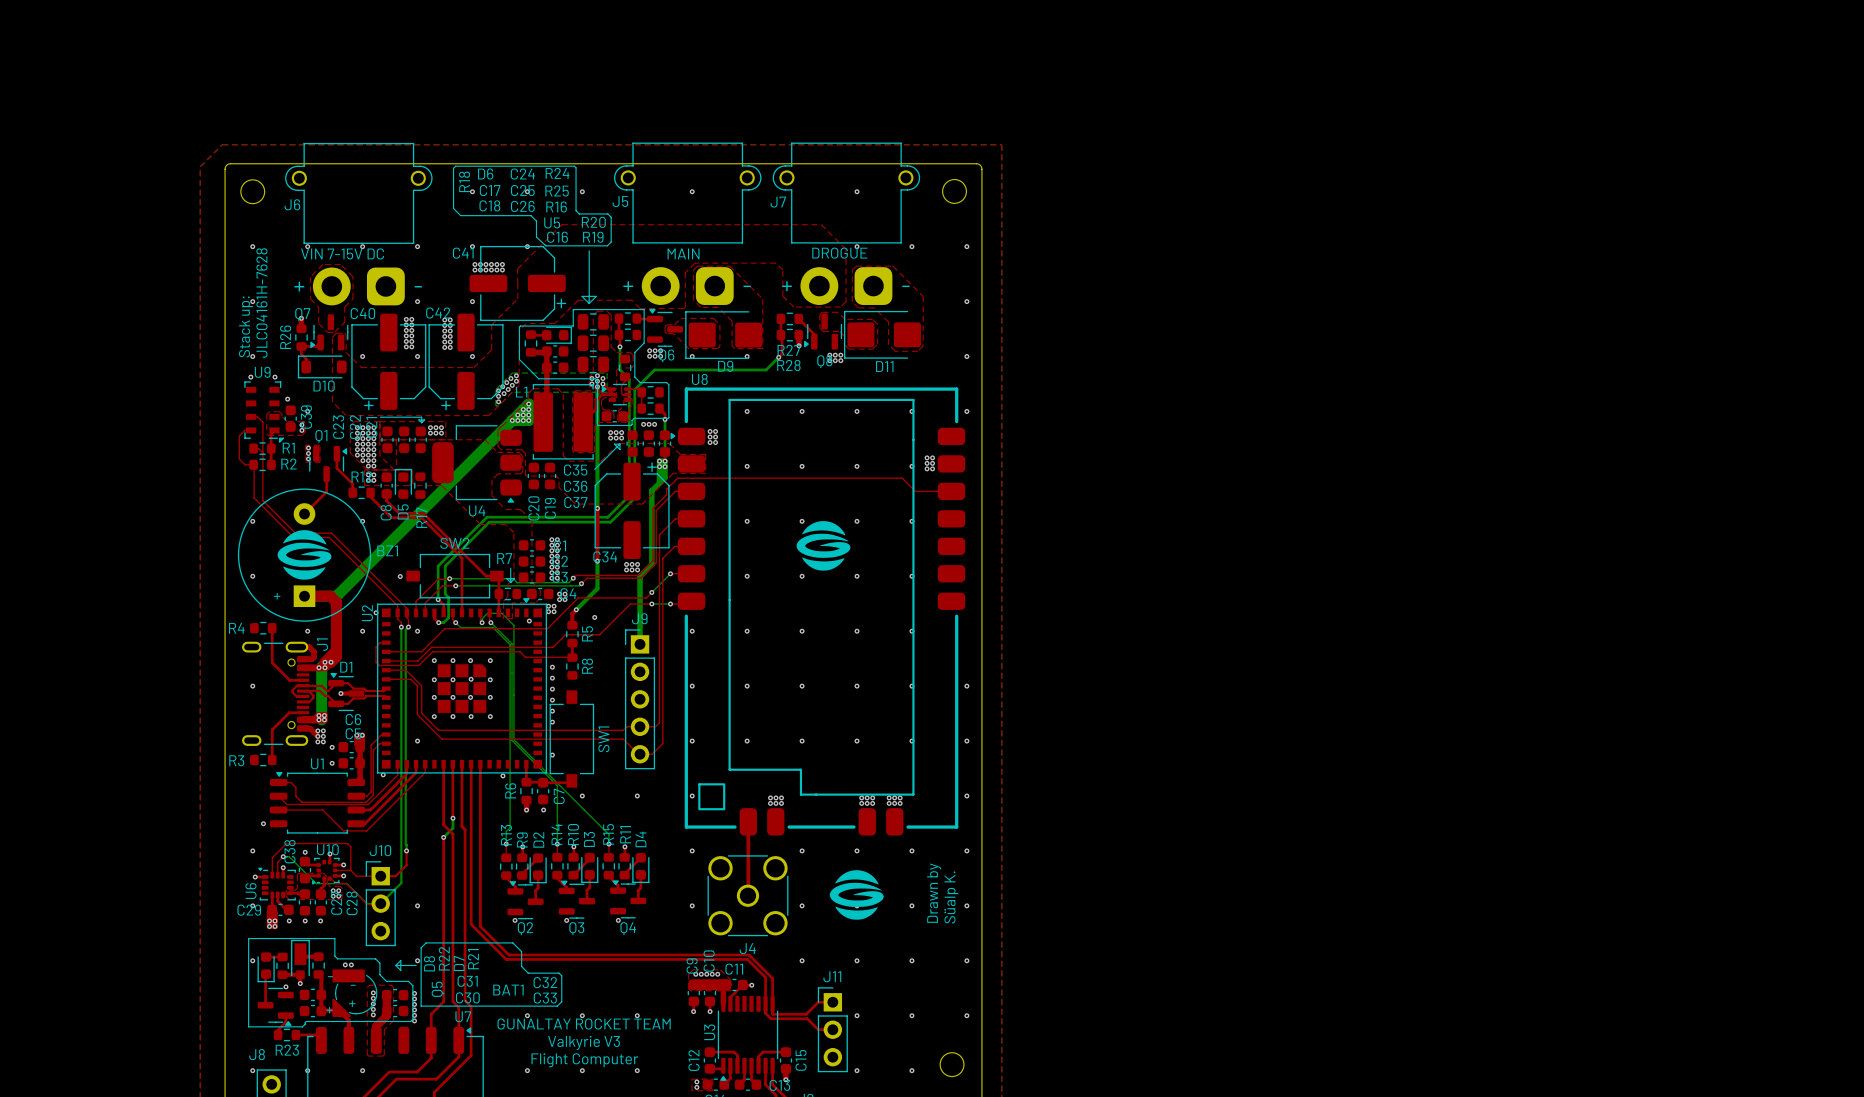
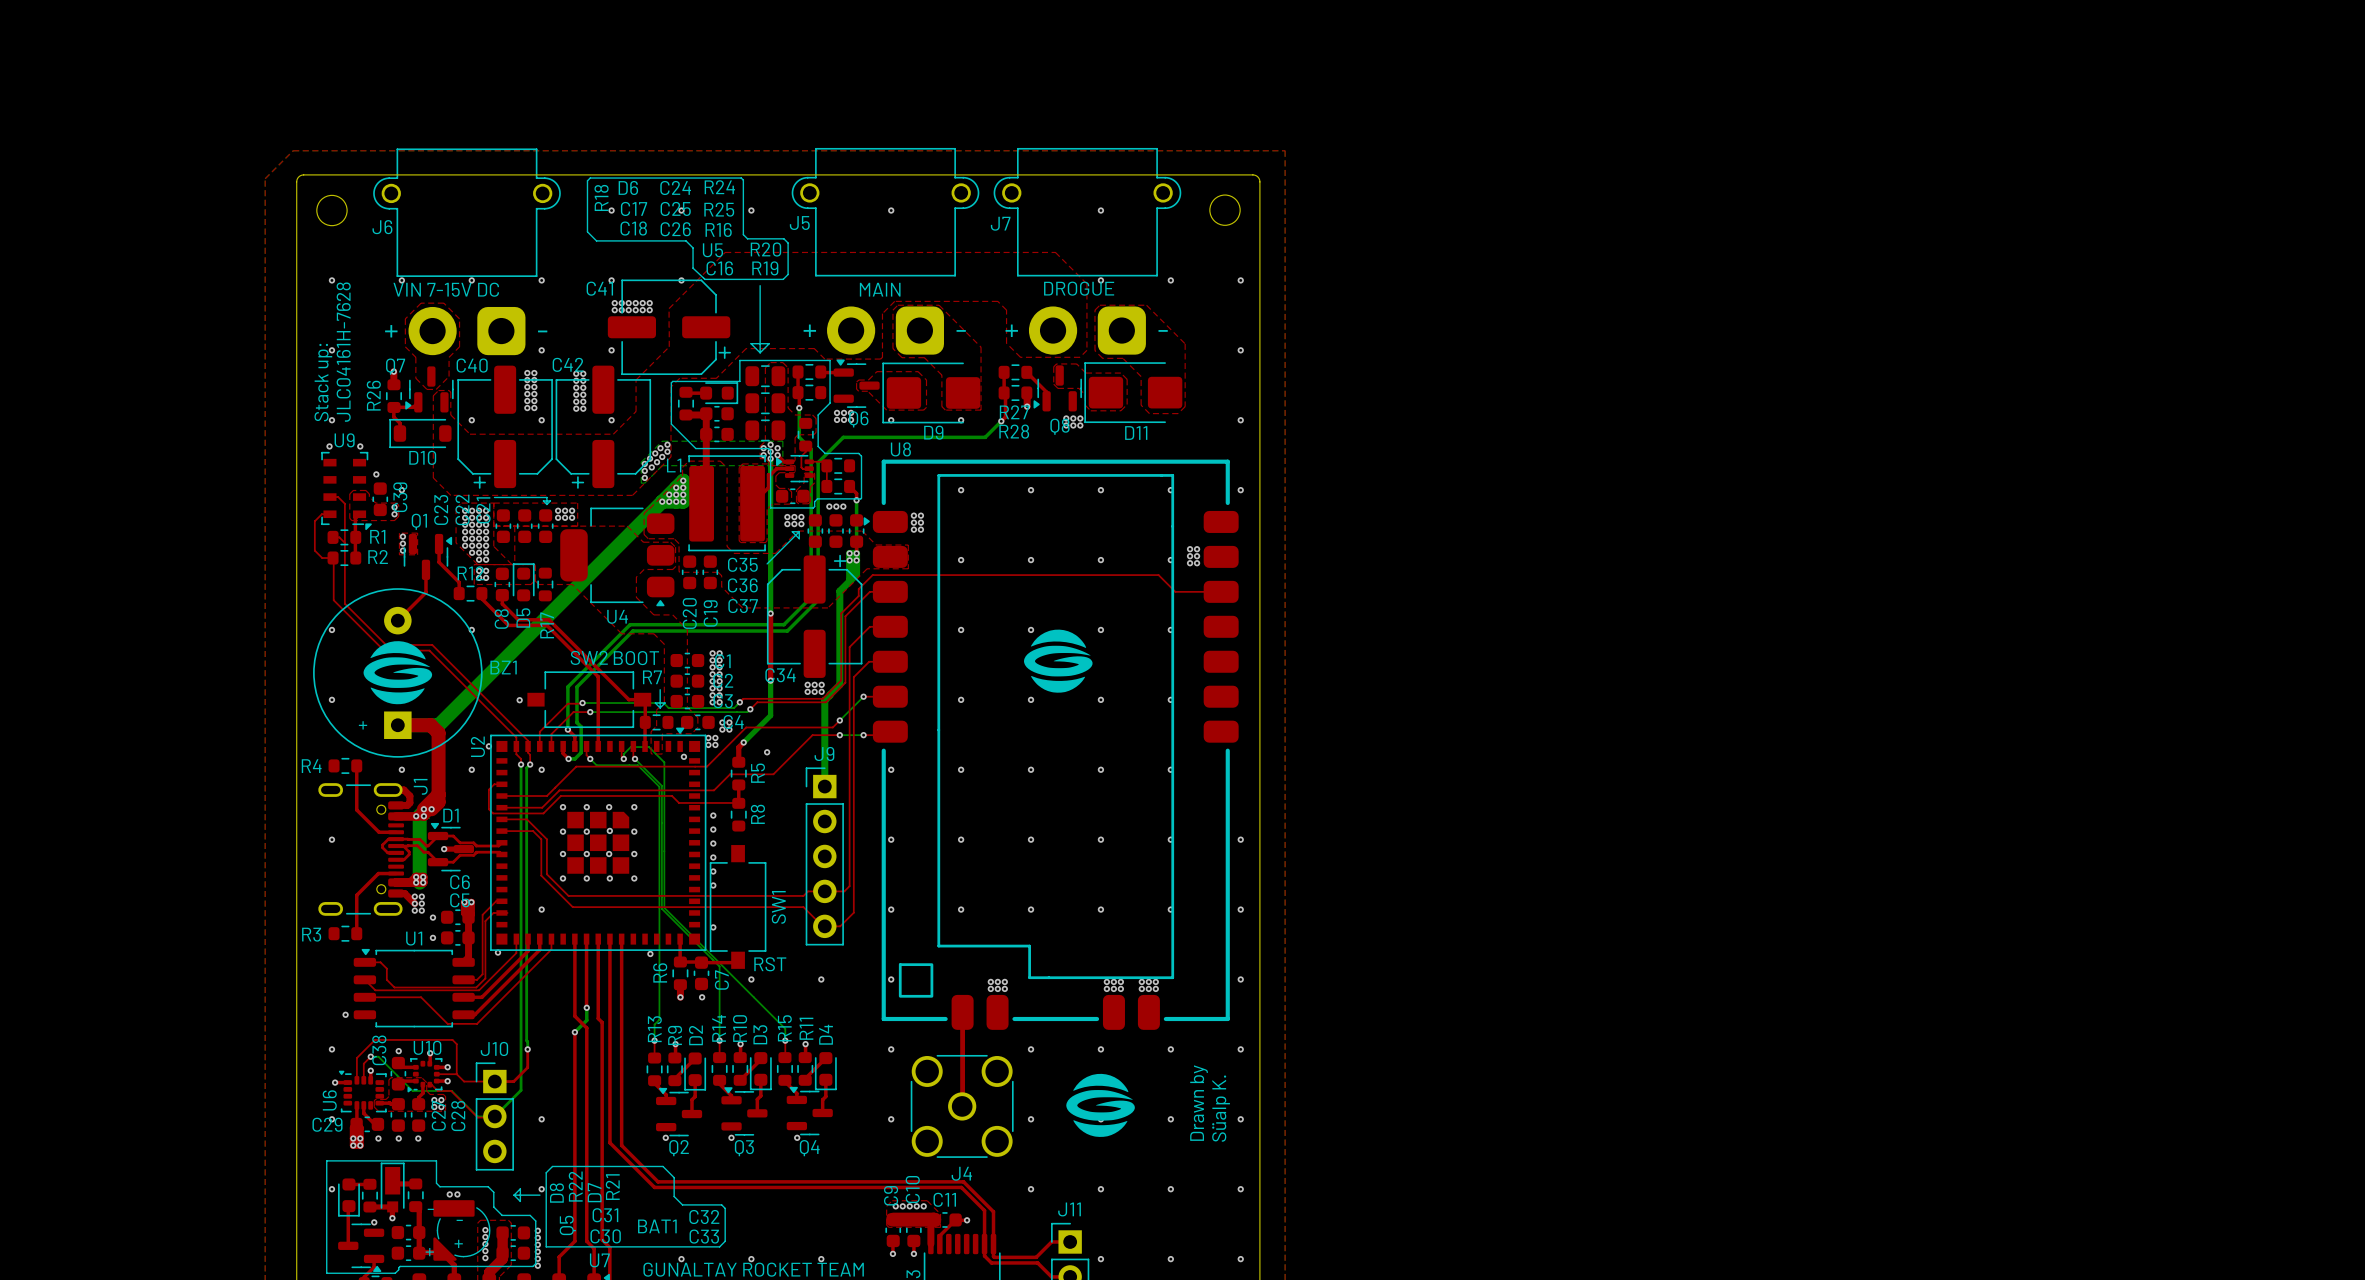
text: none -> BOOT (636, 658)
text: none -> RST (770, 964)

